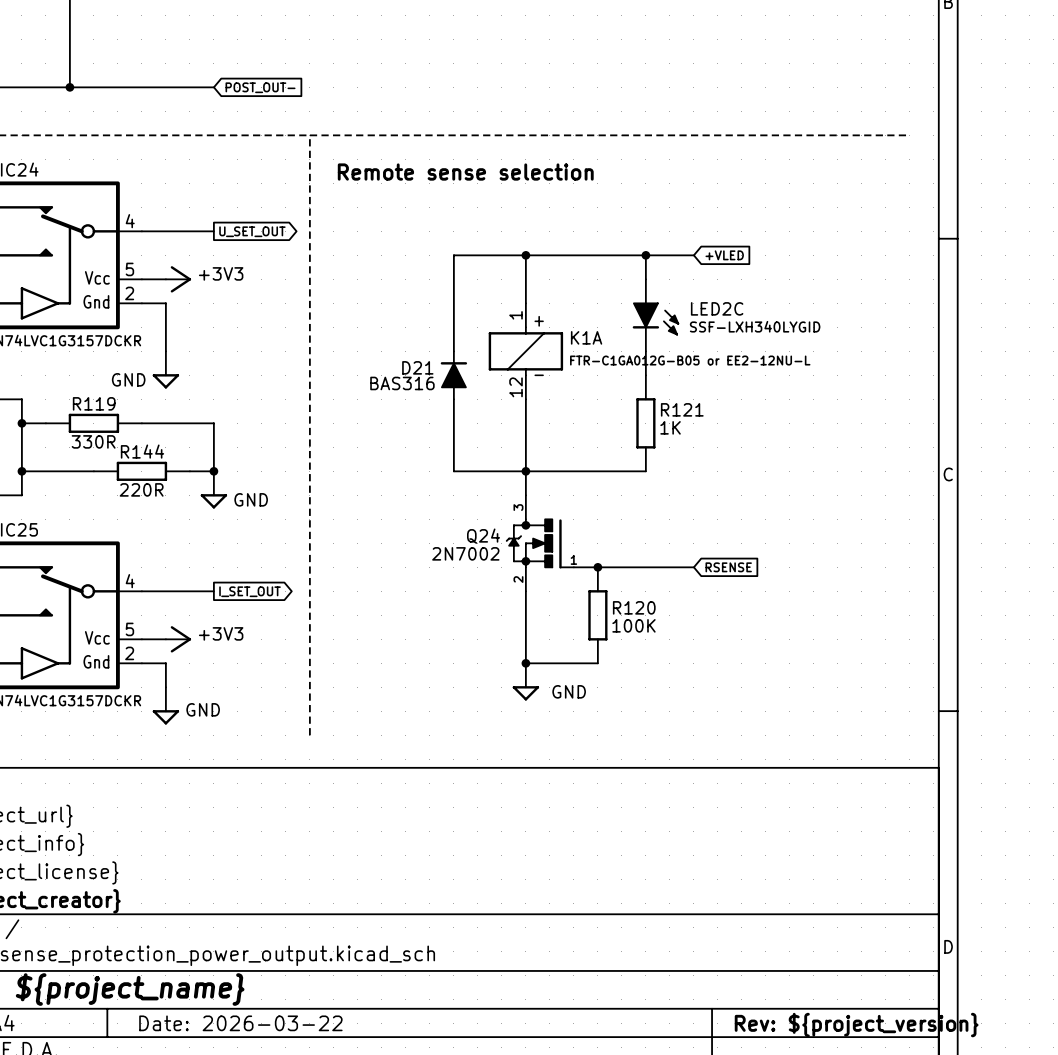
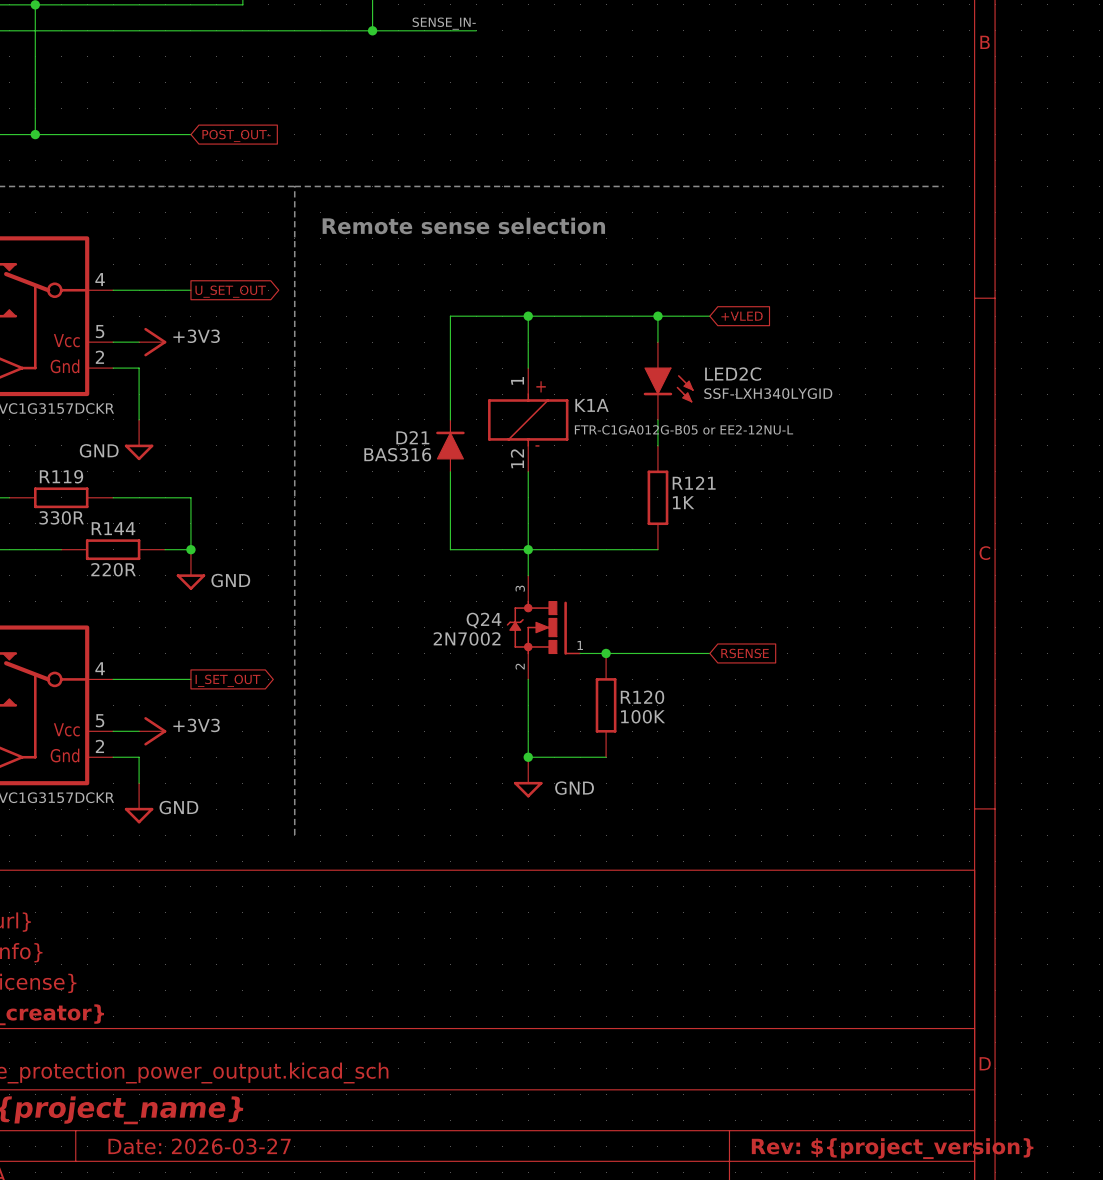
title block: Date: 2026-03-22 (240, 1023) -> Date: 2026-03-27 (199, 1146)

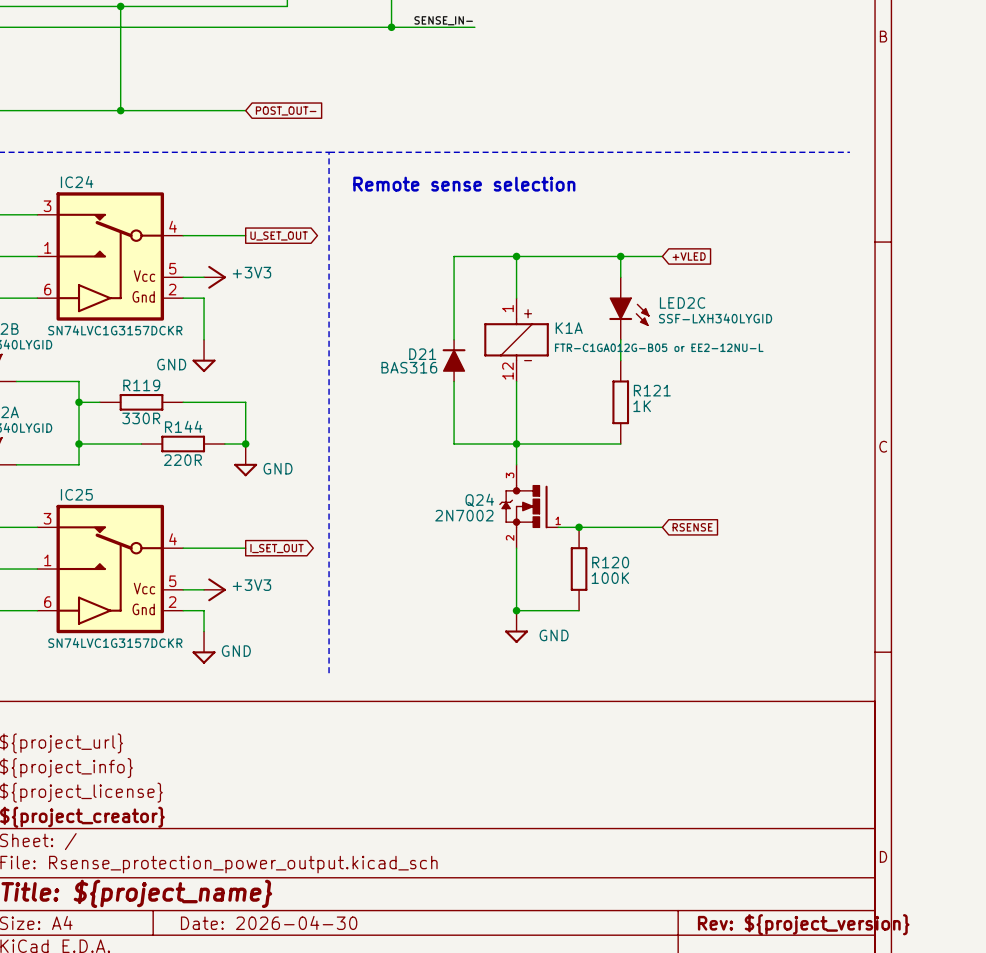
title block: Date: 2026-03-27 (199, 1146) -> Date: 2026-04-30 (269, 922)

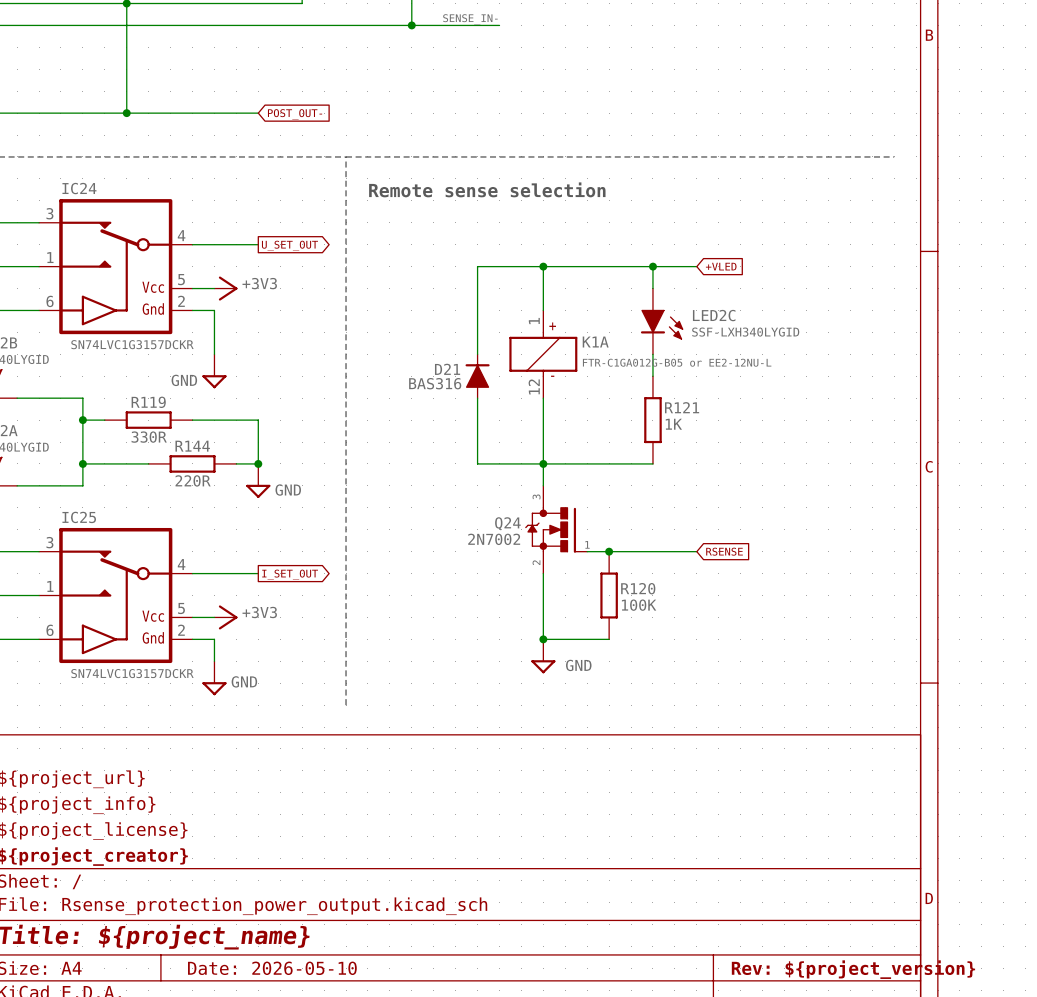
title block: Date: 2026-04-30 (269, 922) -> Date: 2026-05-10 (272, 968)

